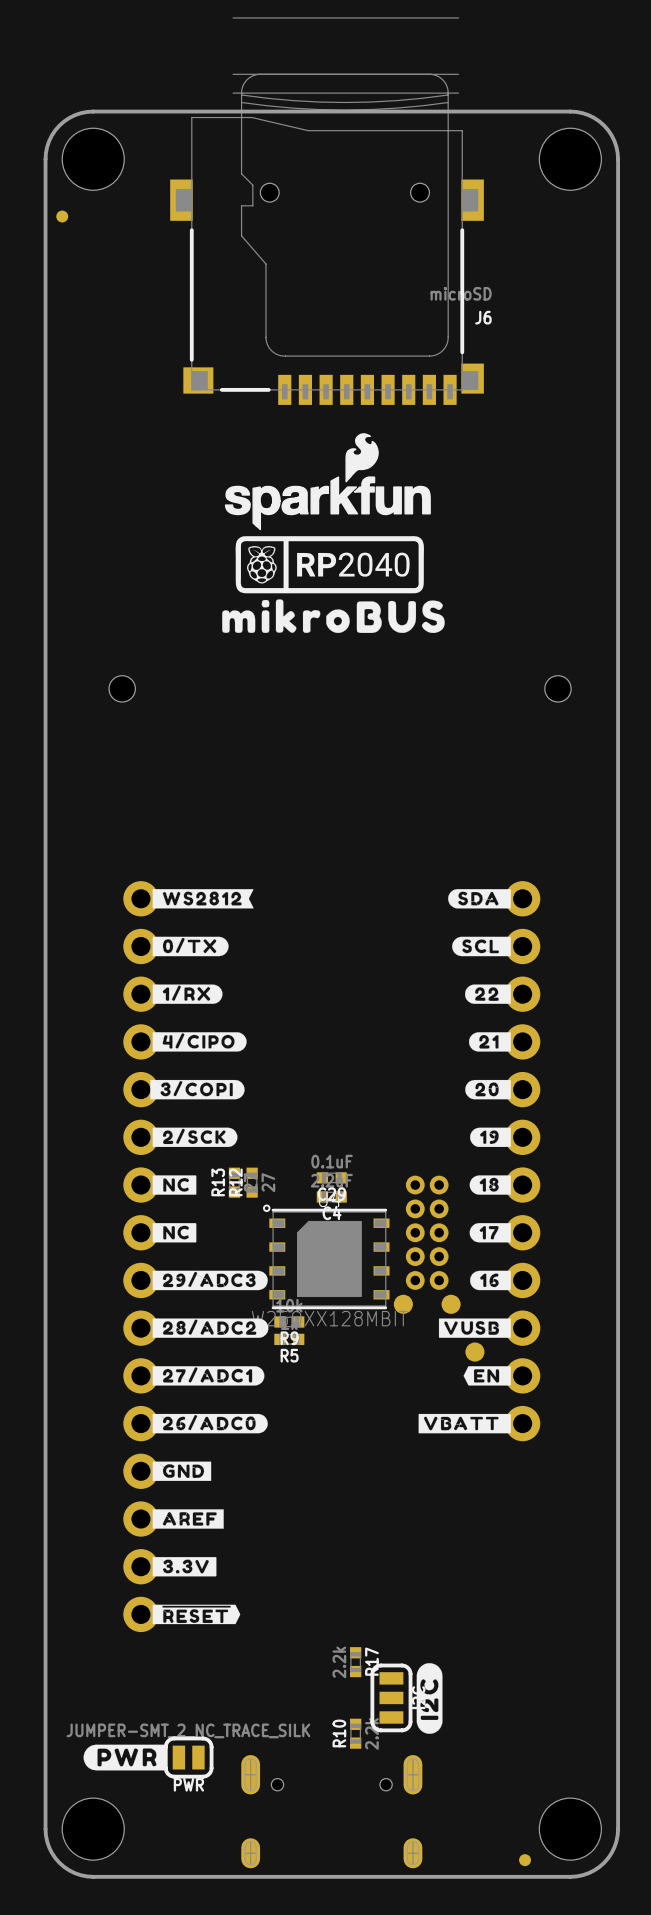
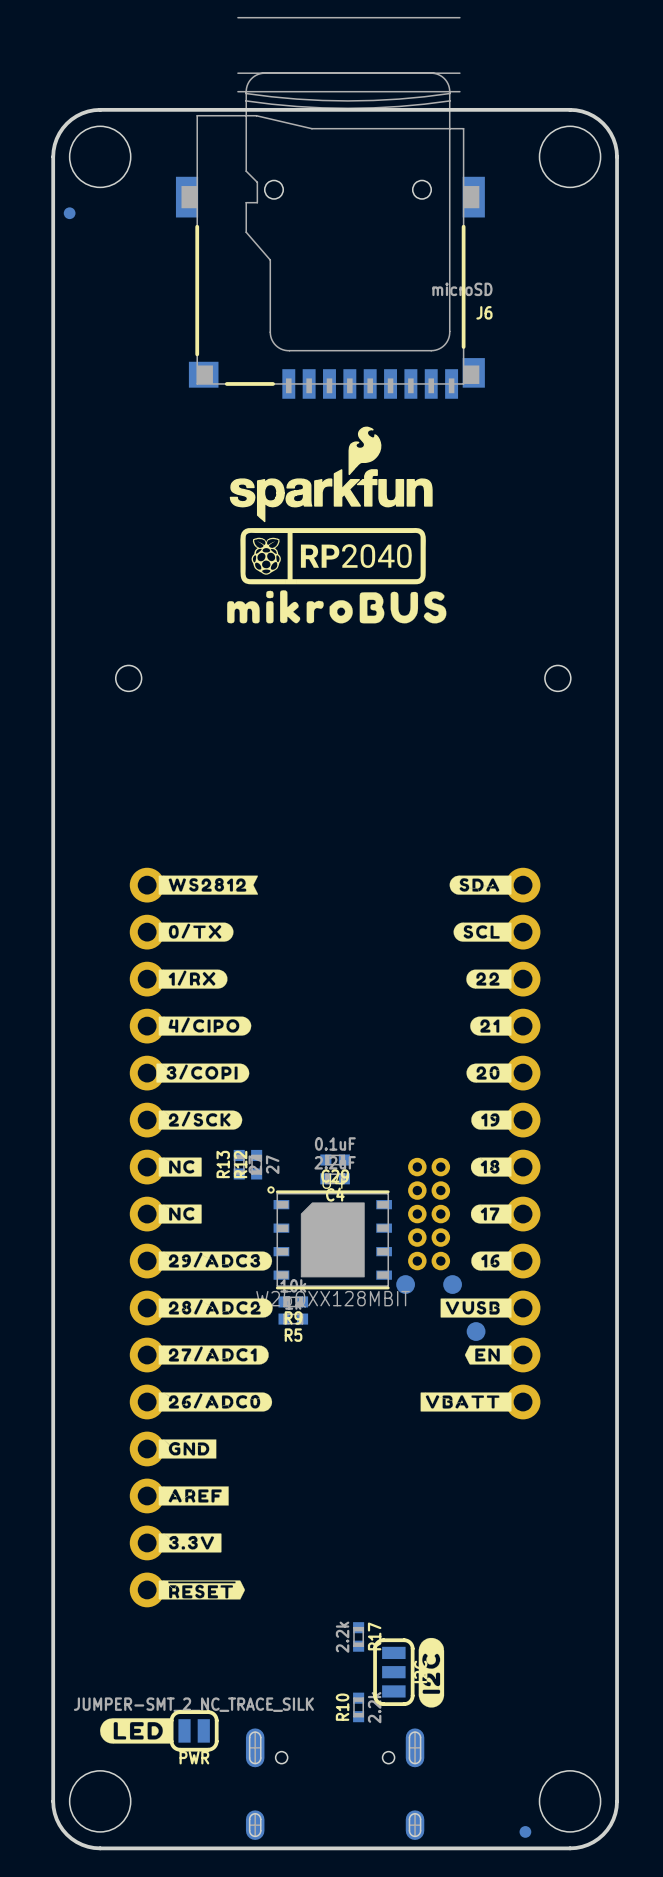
drawing shape: [83, 1744, 166, 1771] -> [100, 1718, 172, 1744]

